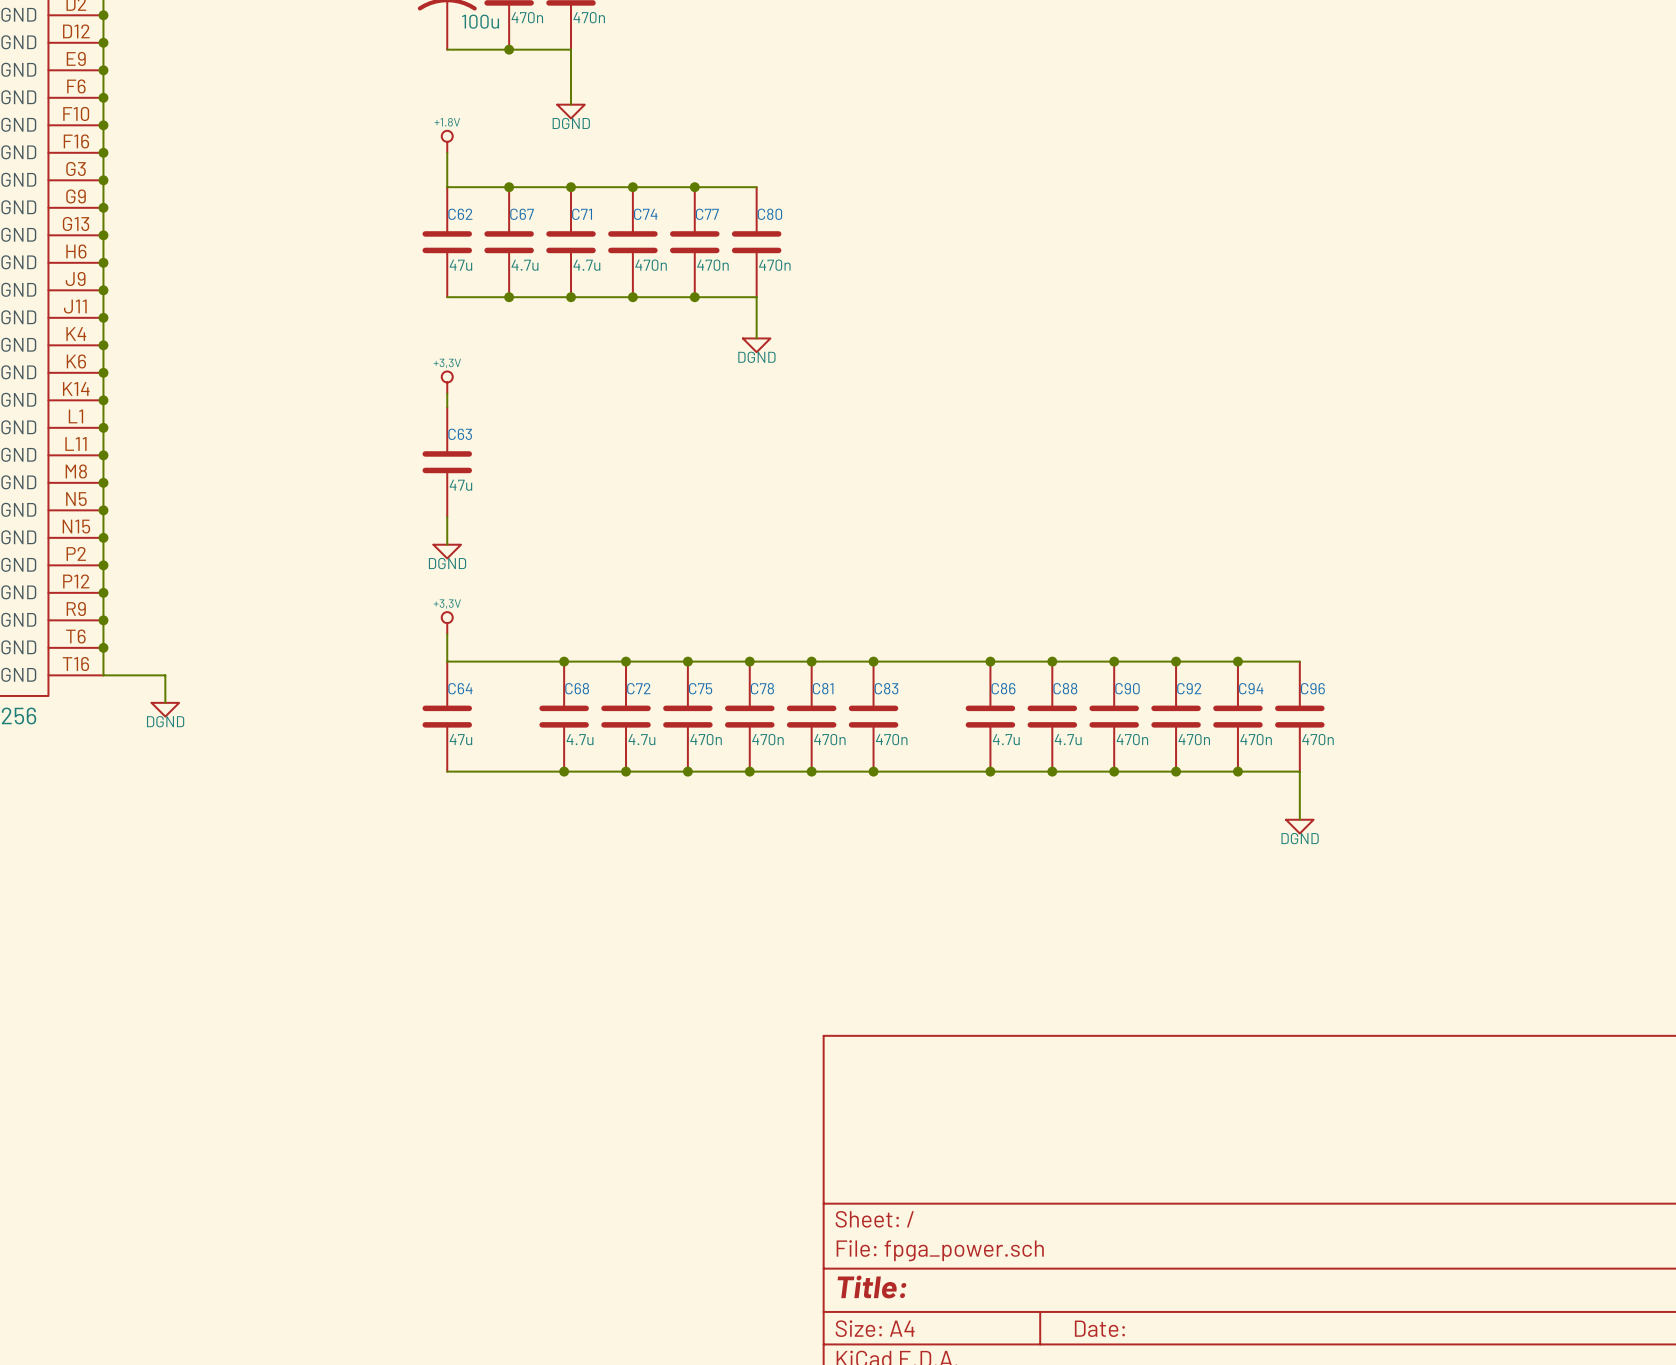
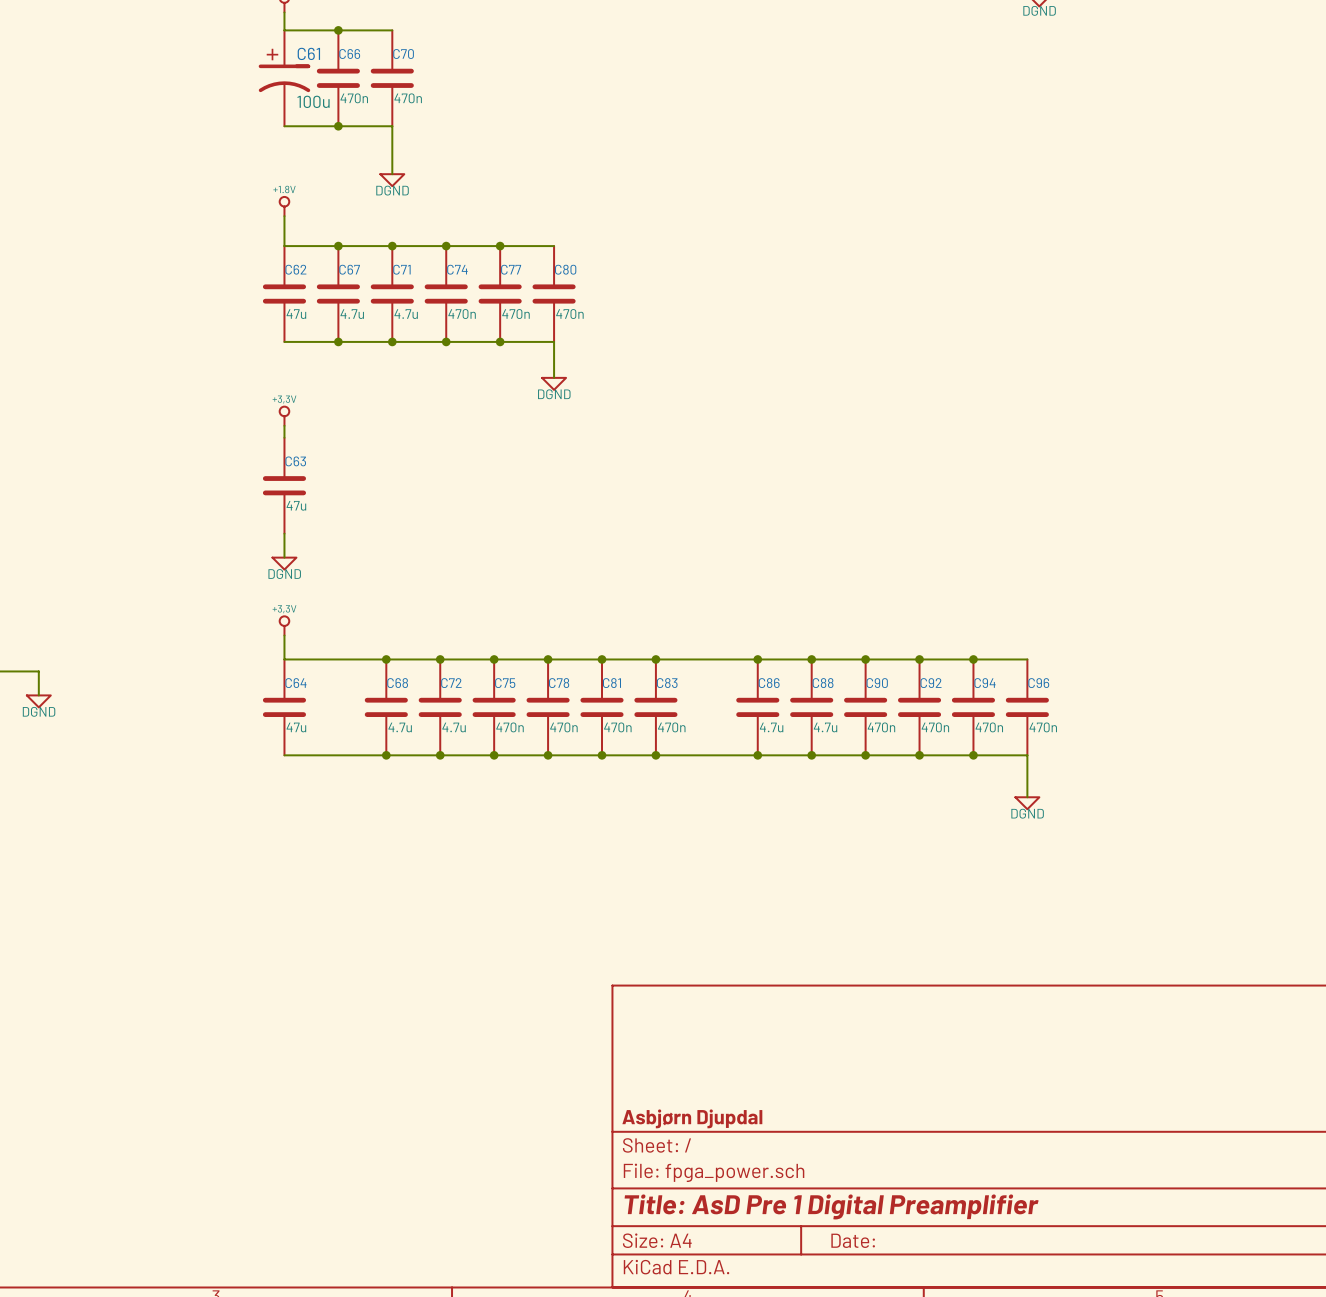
title block: none -> Asbjørn Djupdal (692, 1118)
title block: Title: (871, 1286) -> Title: AsD Pre 1 Digital Preamplifier (831, 1206)

